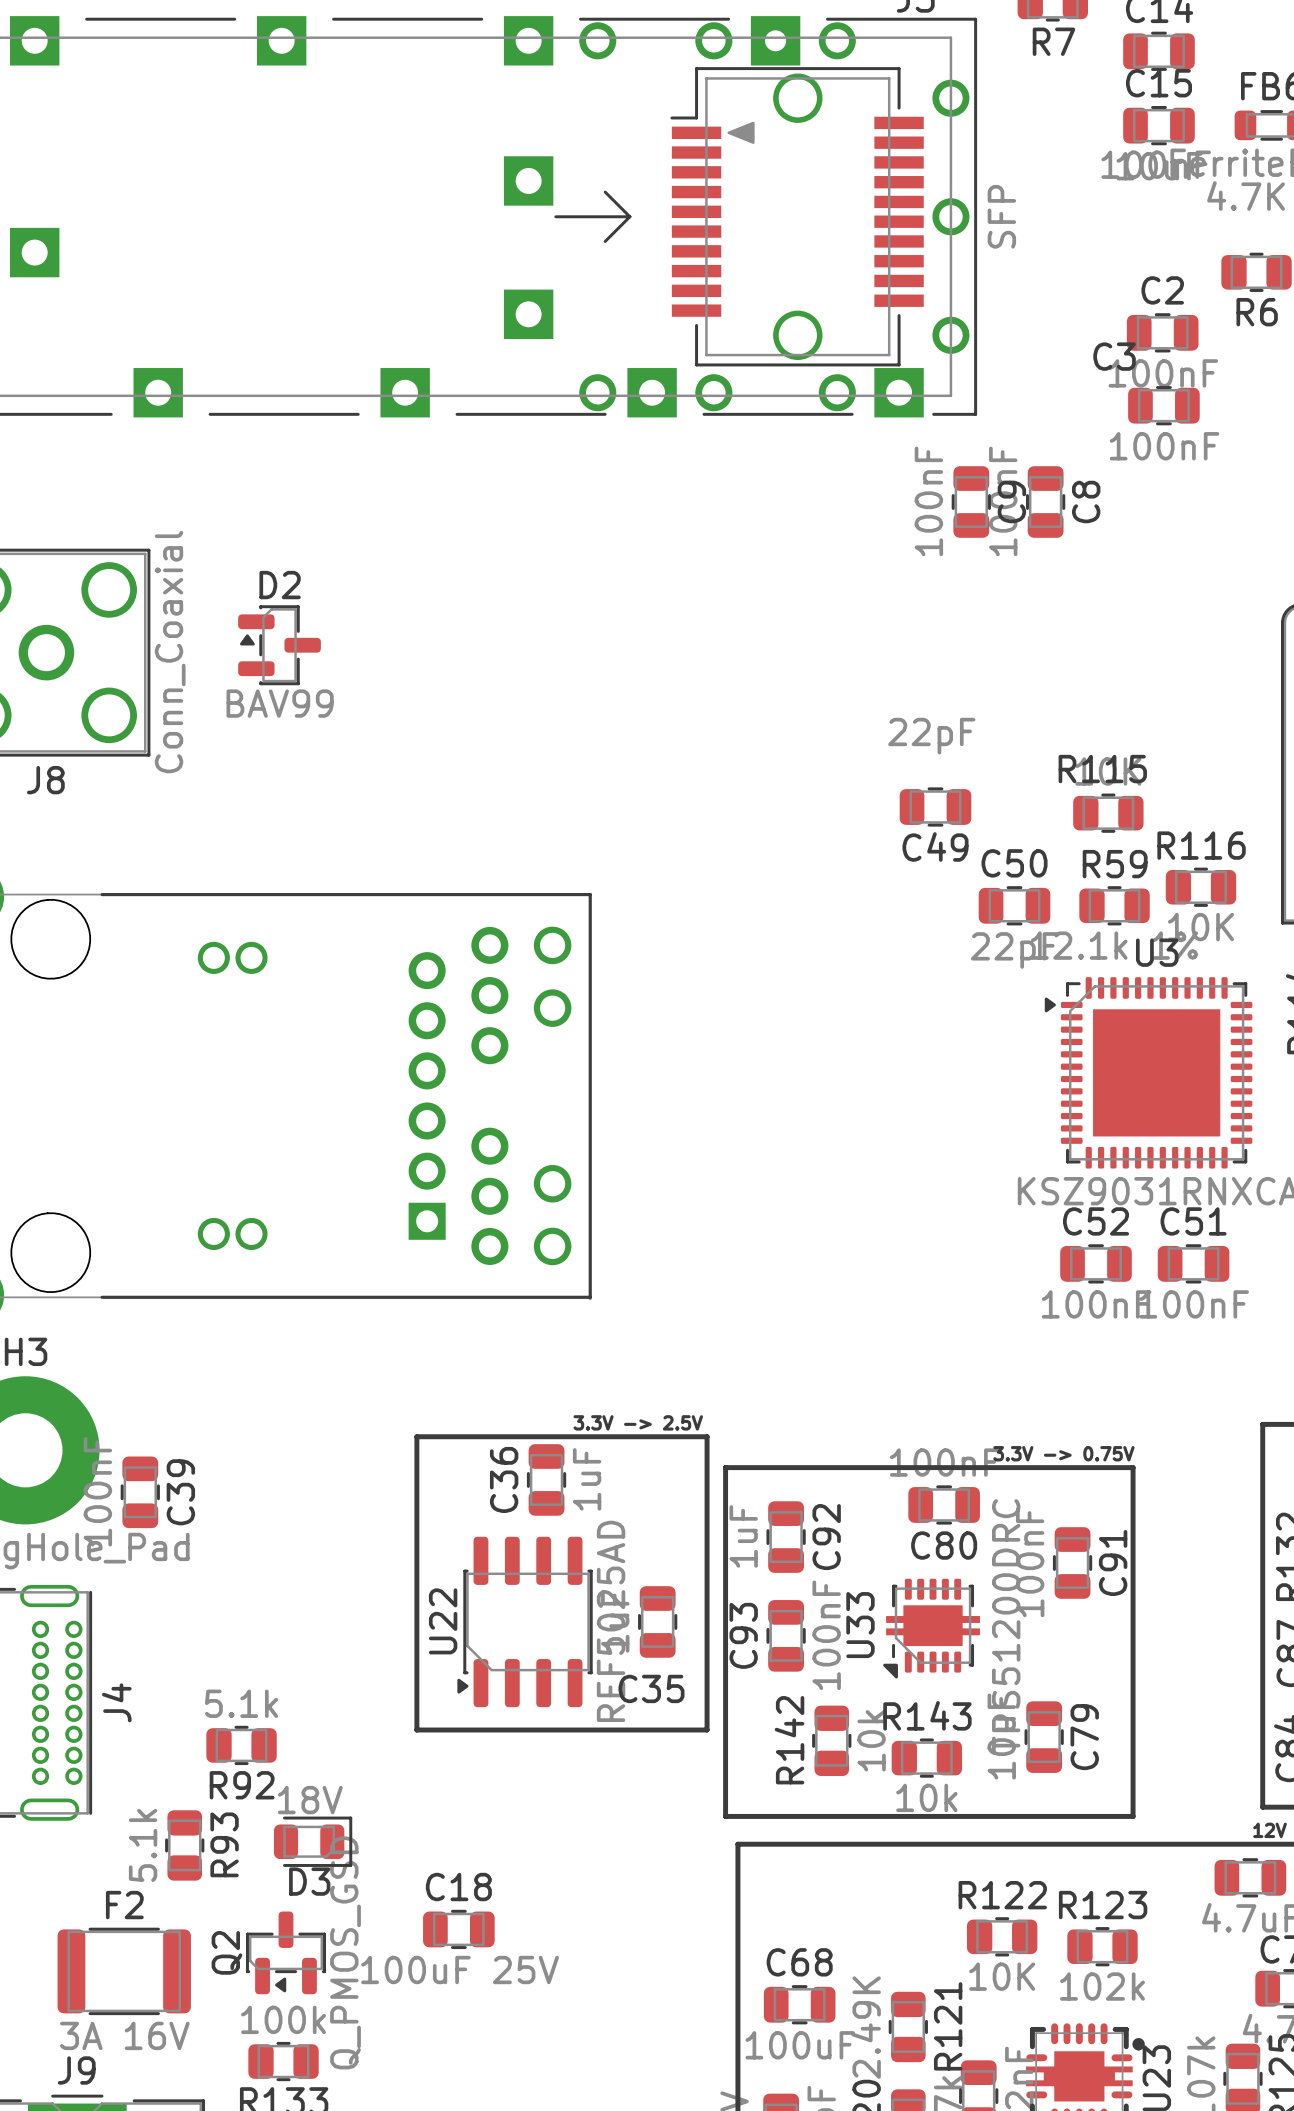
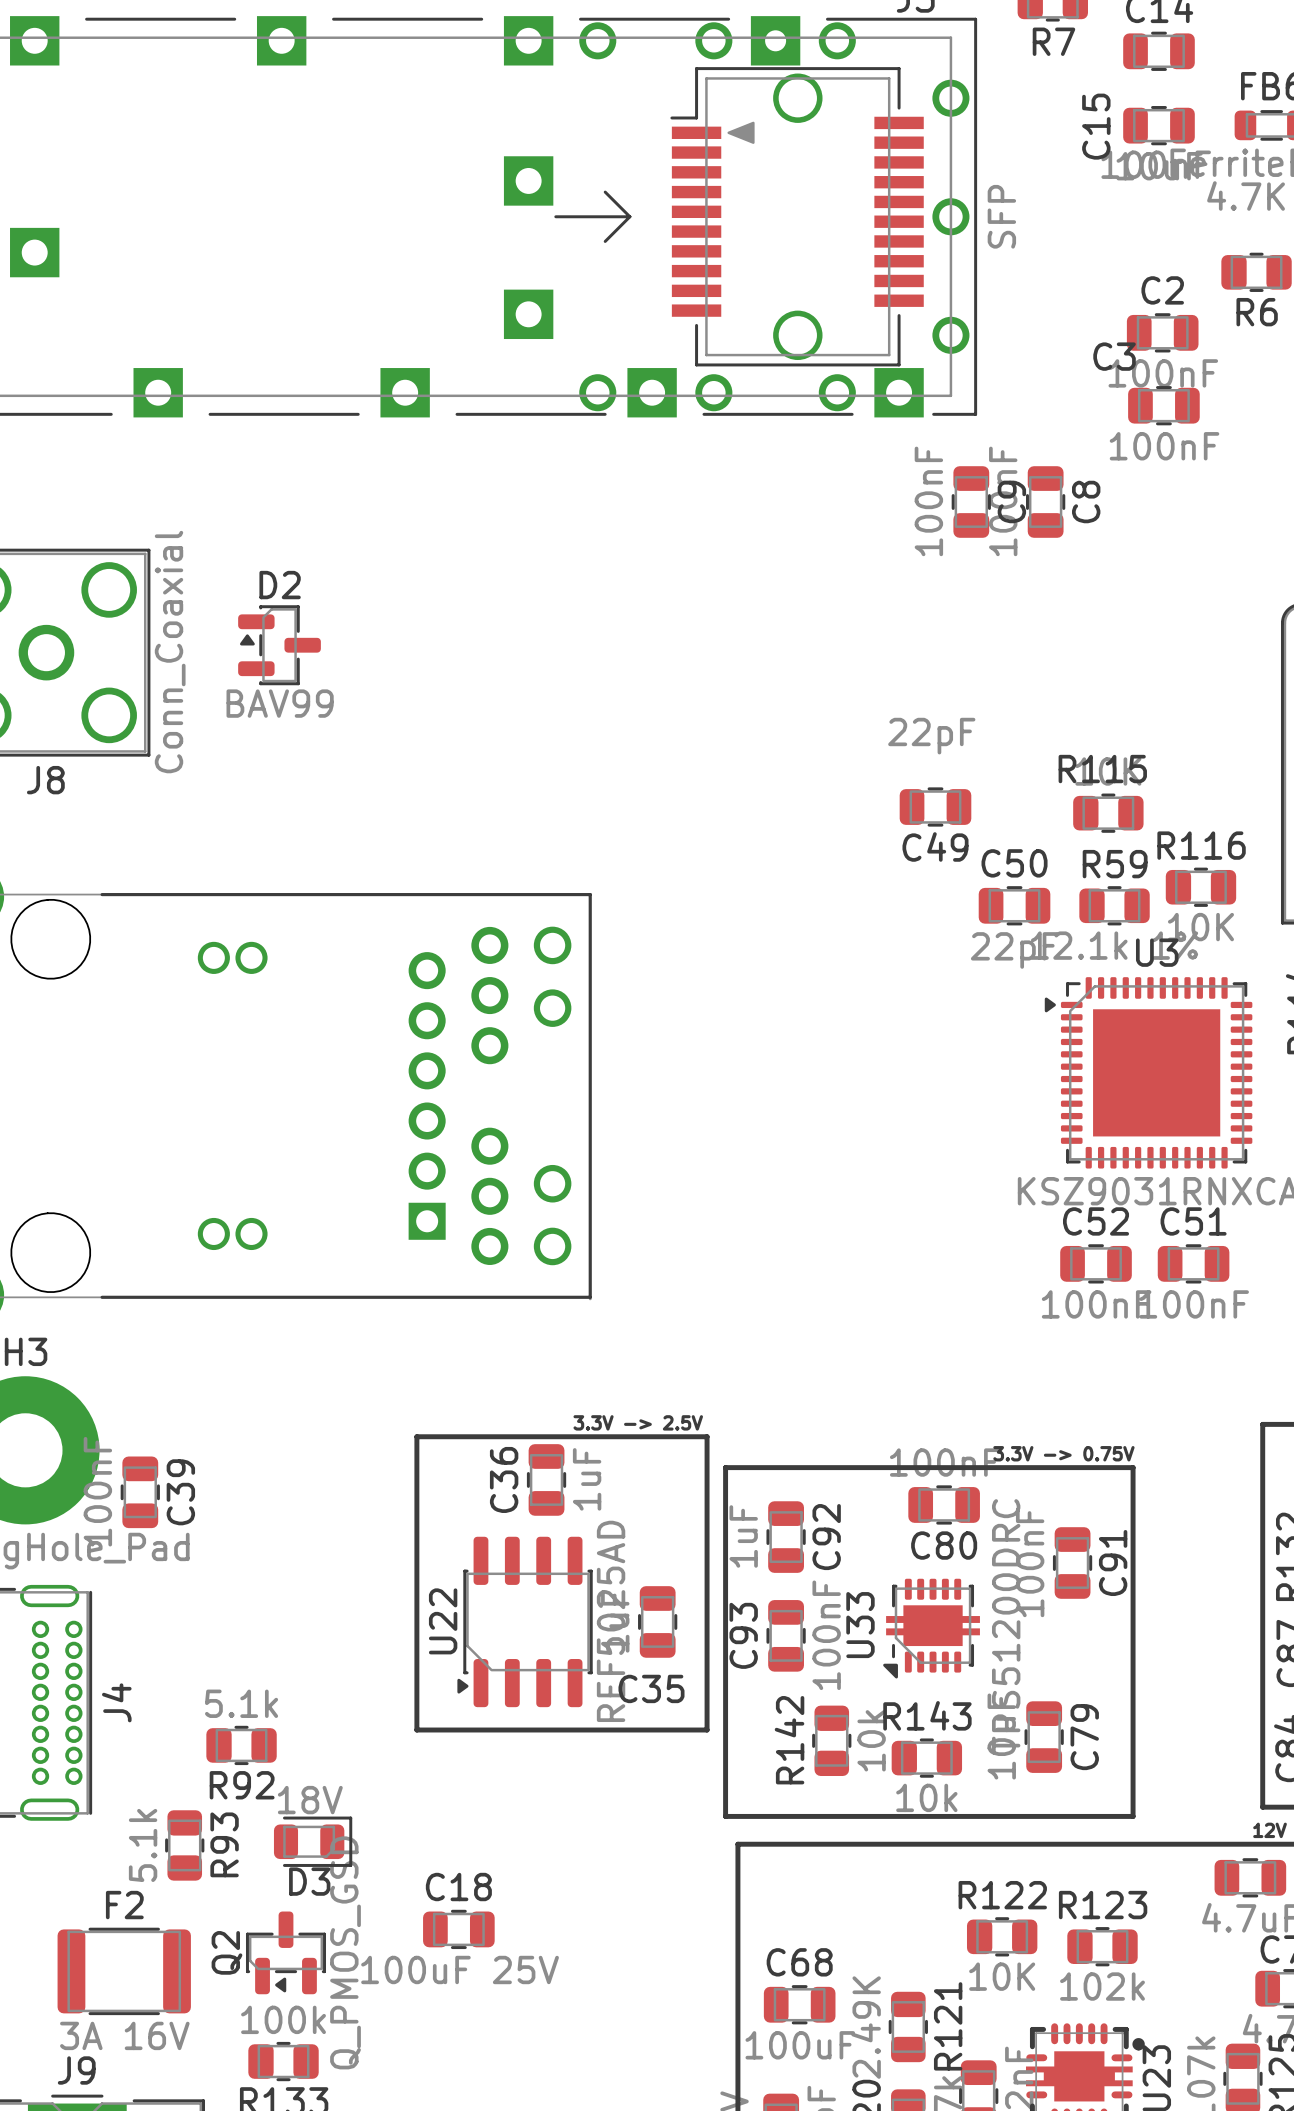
C15 name rotation: 0° (1158, 83) -> 90° counterclockwise (1096, 126)

